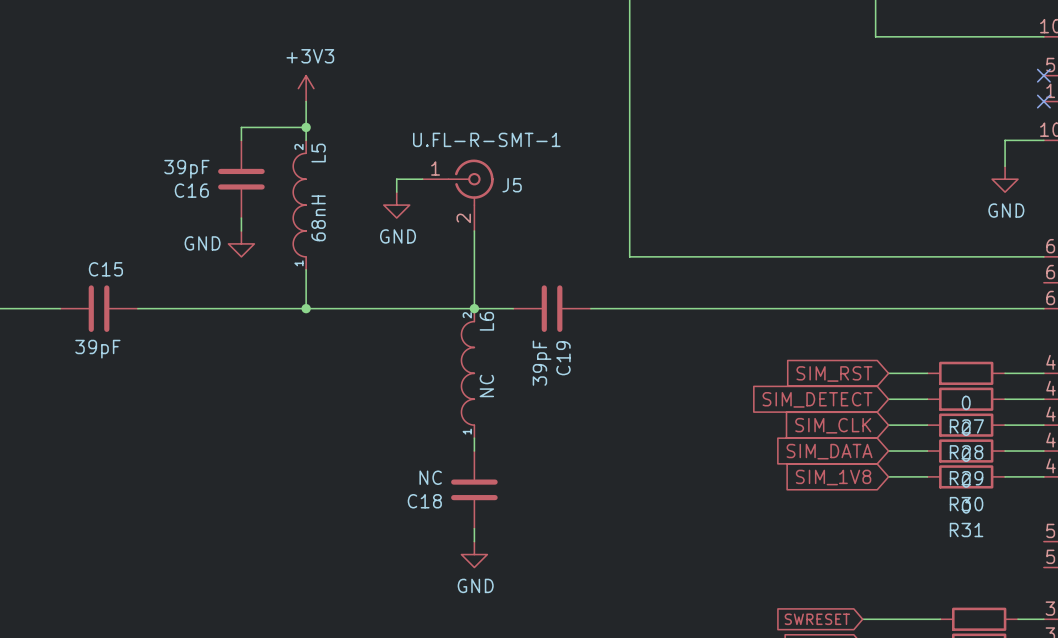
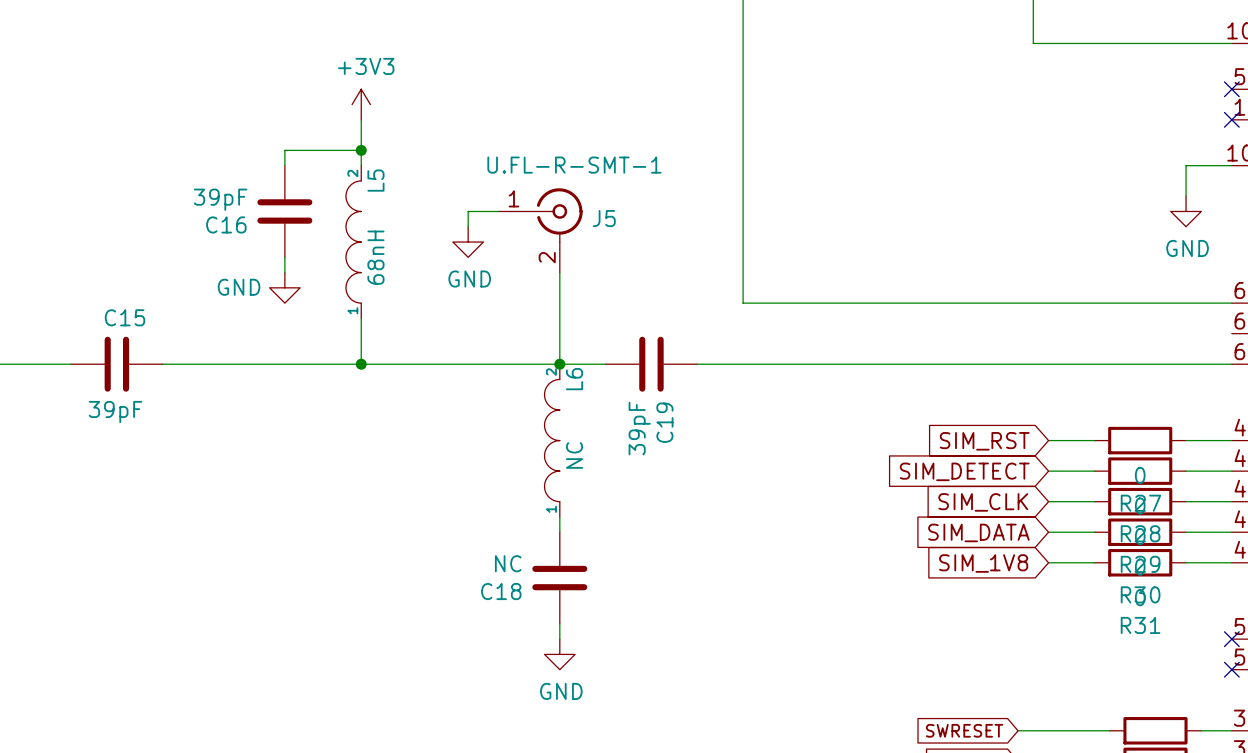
no-connect mark: none -> (1231, 639)
no-connect mark: none -> (1231, 669)

